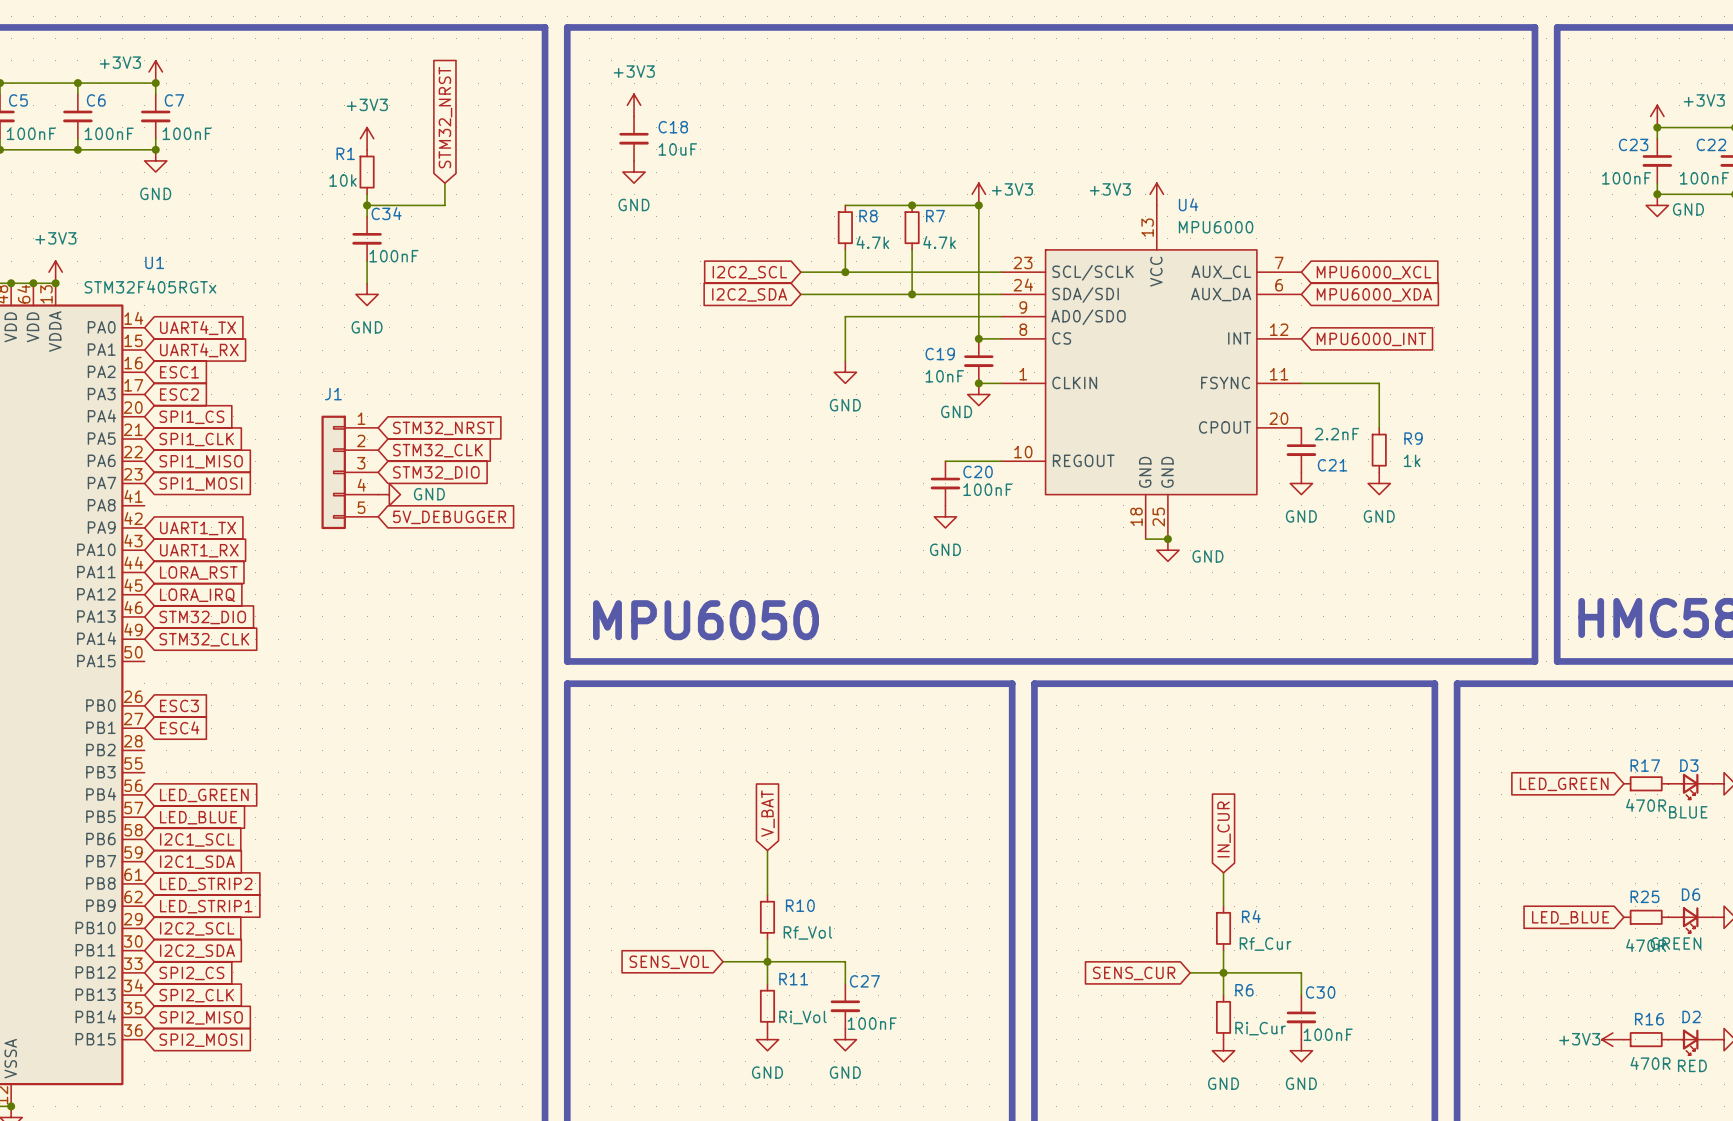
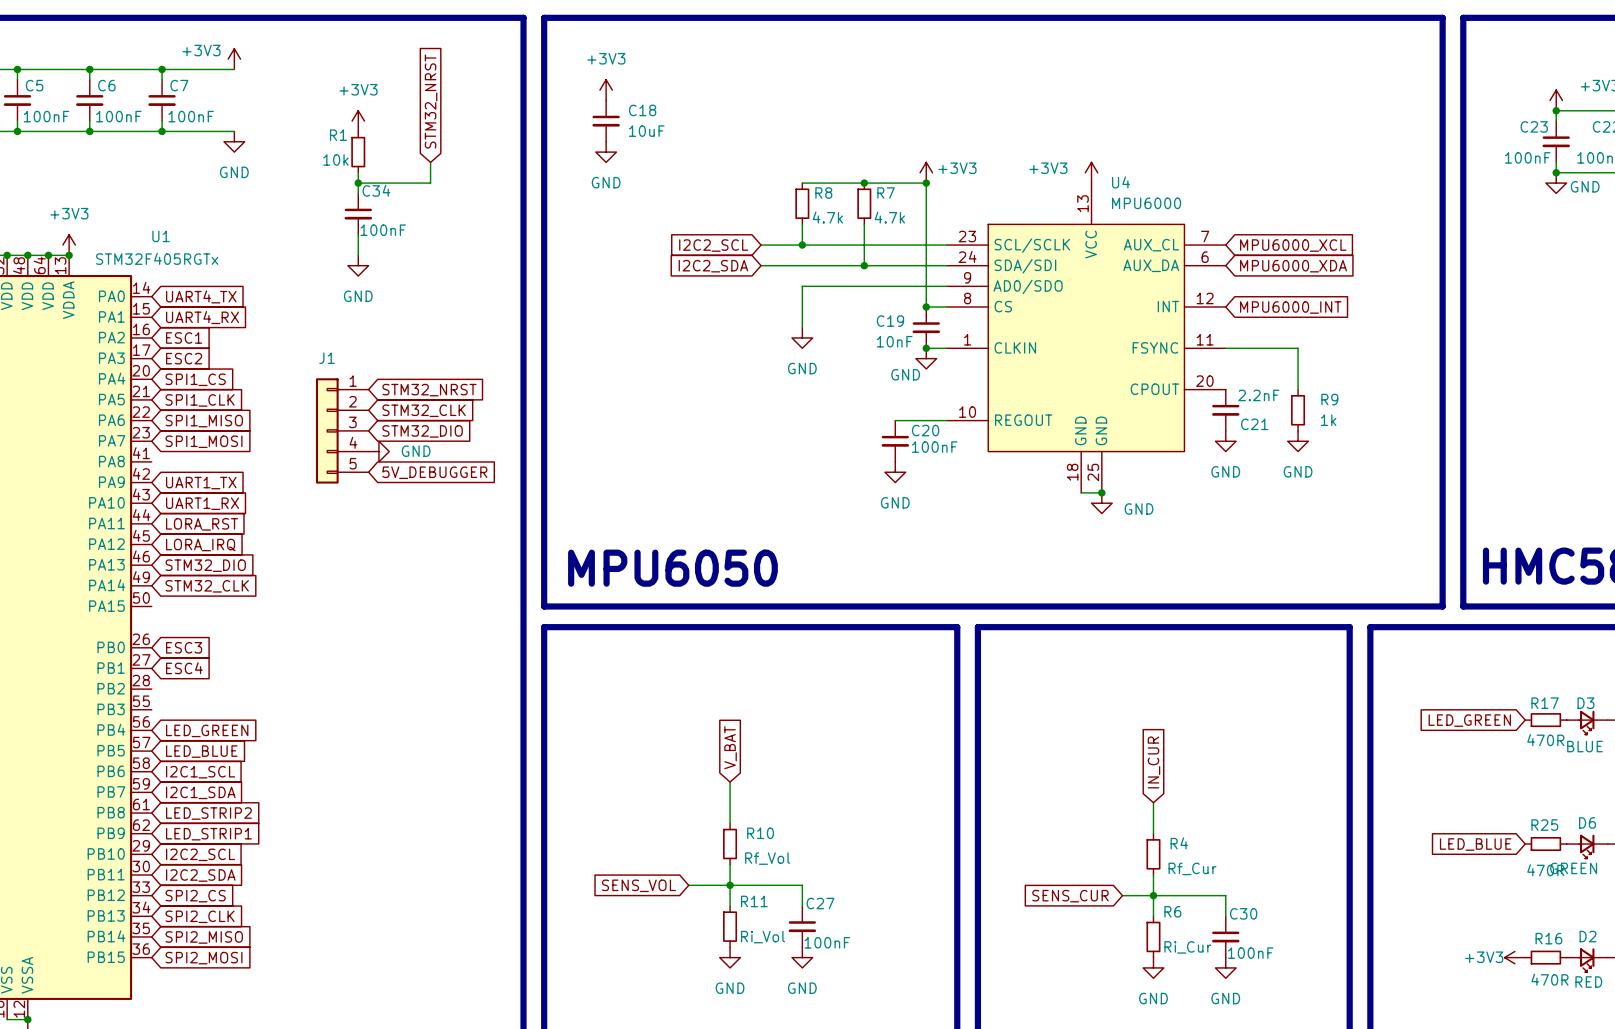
power symbol position: +3V3 (155, 71) -> +3V3 (234, 59)
wire: none -> (162, 69) (234, 69)
wire: none -> (162, 131) (234, 131)
power symbol position: GND (155, 160) -> GND (234, 141)

